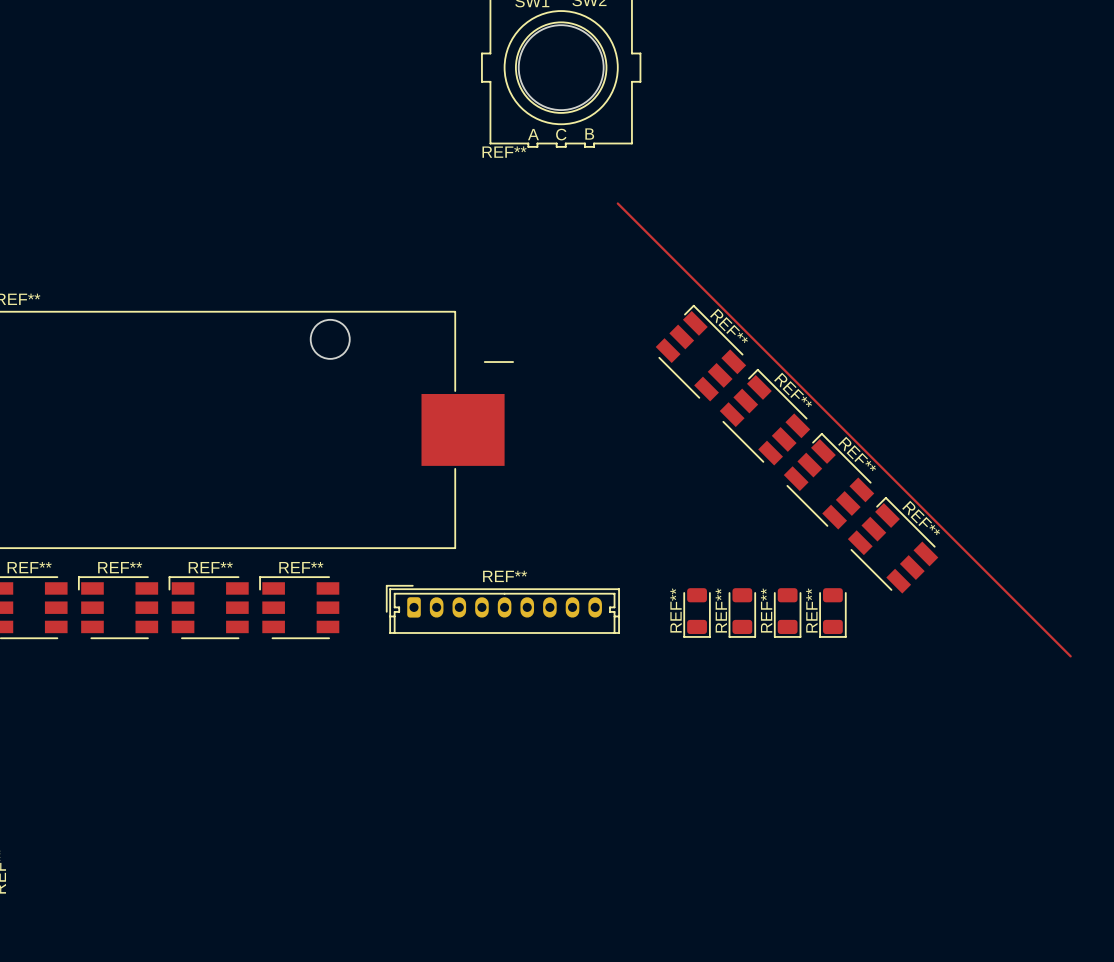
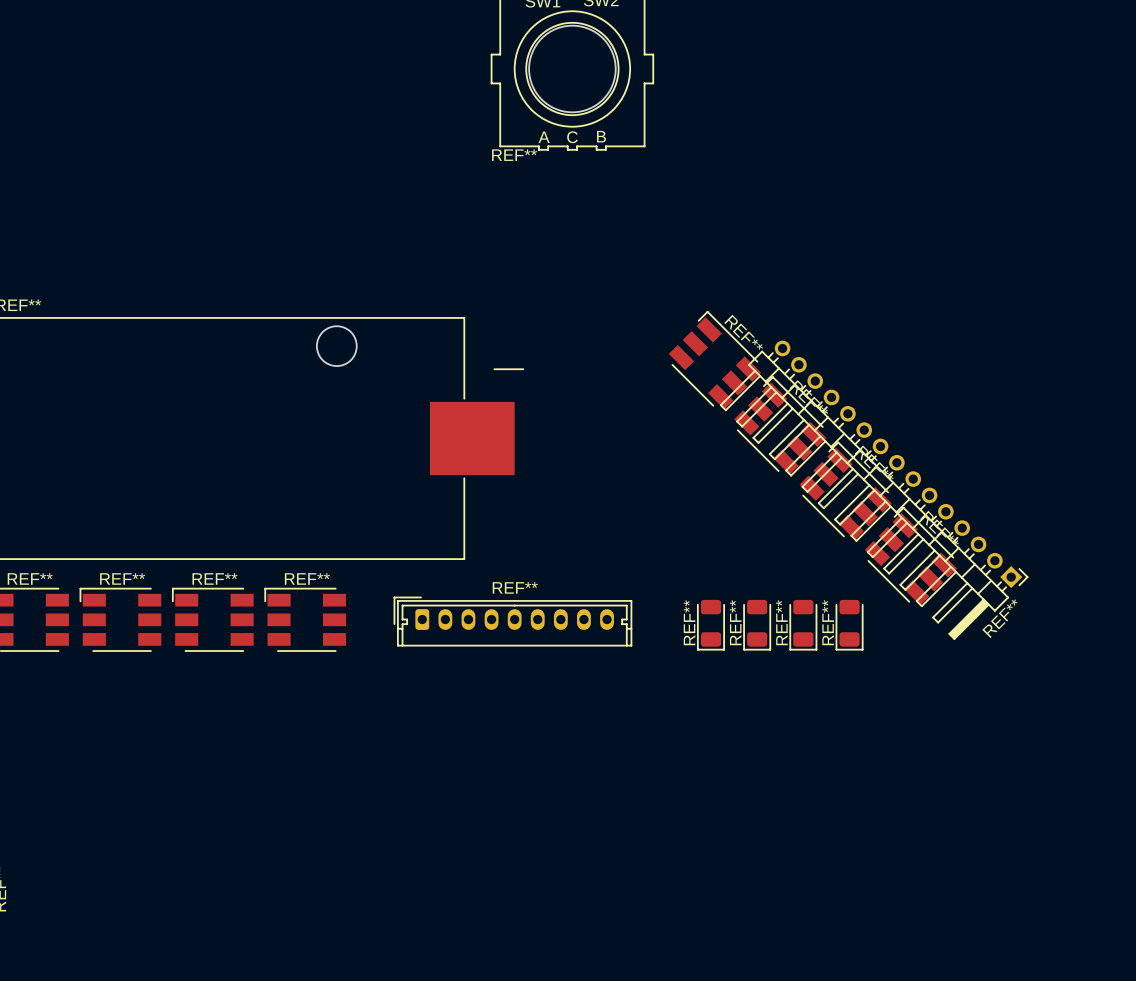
top track: (617, 203) (1070, 656) -> none
REF**: none -> (874, 490)

